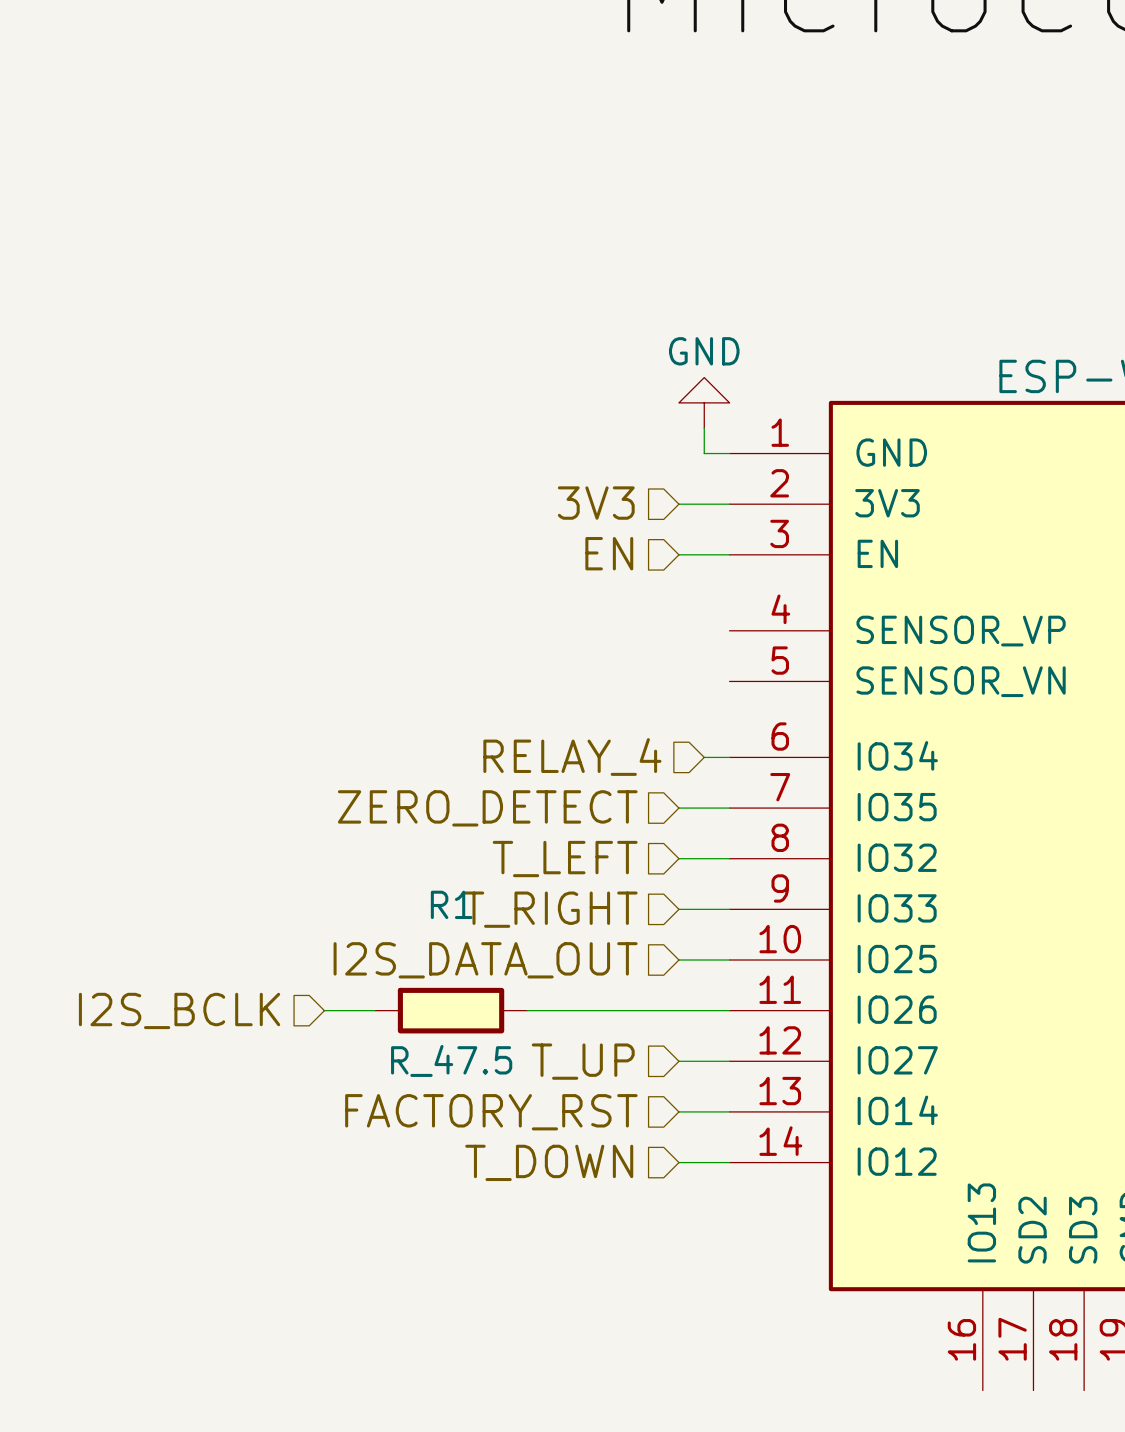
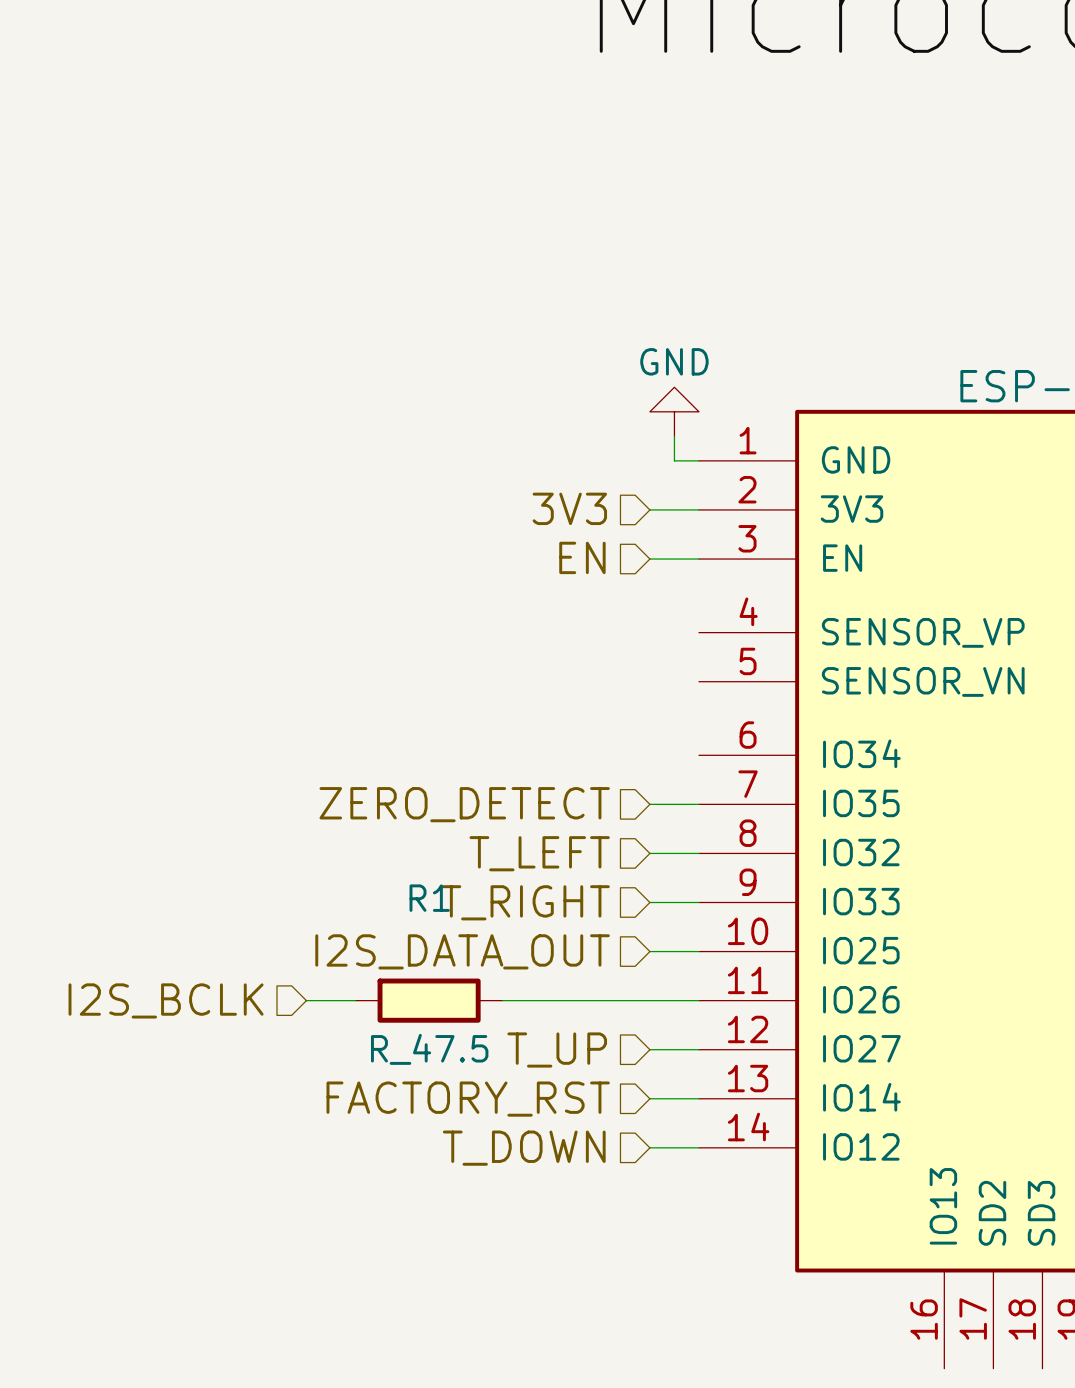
hierarchical label: RELAY_4 (572, 757) -> none
wire: (704, 757) (729, 757) -> none

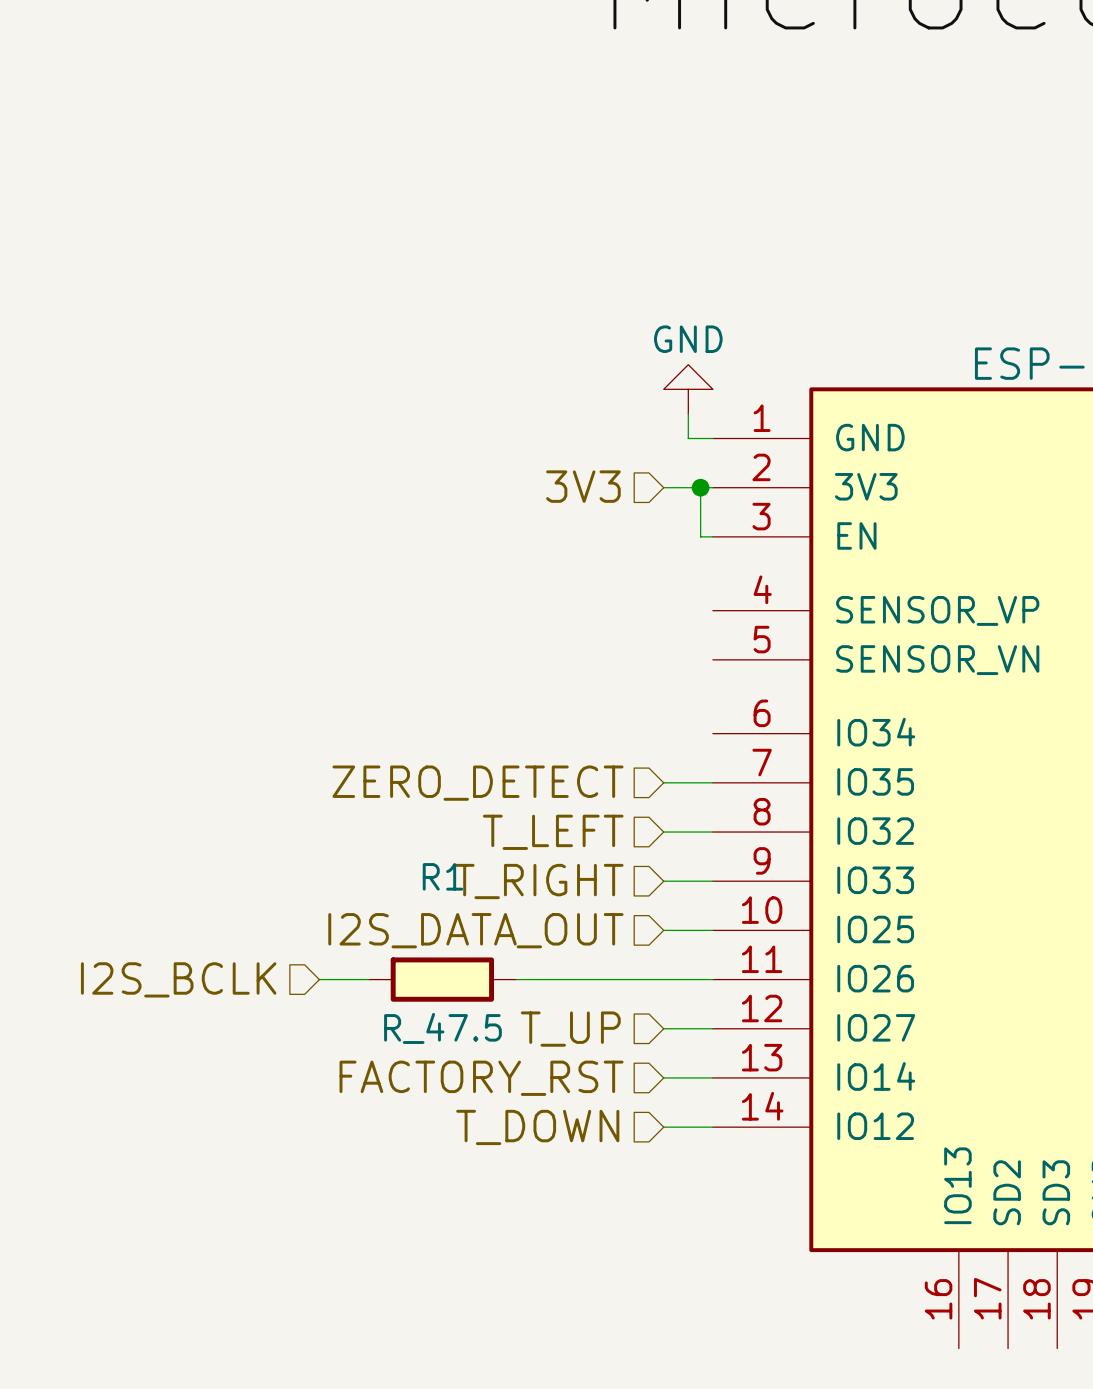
junction: none -> (700, 487)
hierarchical label: EN (582, 557) -> none
wire: (649, 559) (686, 559) -> (700, 487) (700, 536)

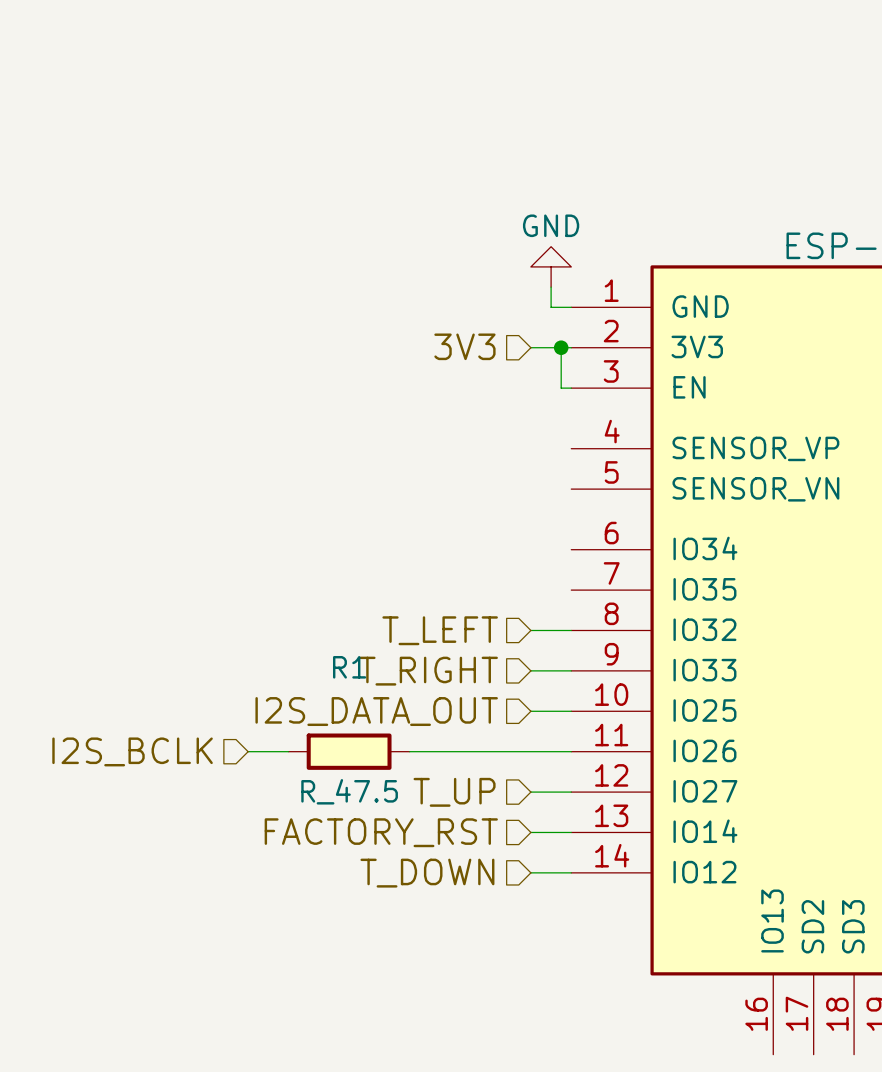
wire: (663, 782) (712, 782) -> none
hierarchical label: ZERO_DETECT (478, 783) -> none

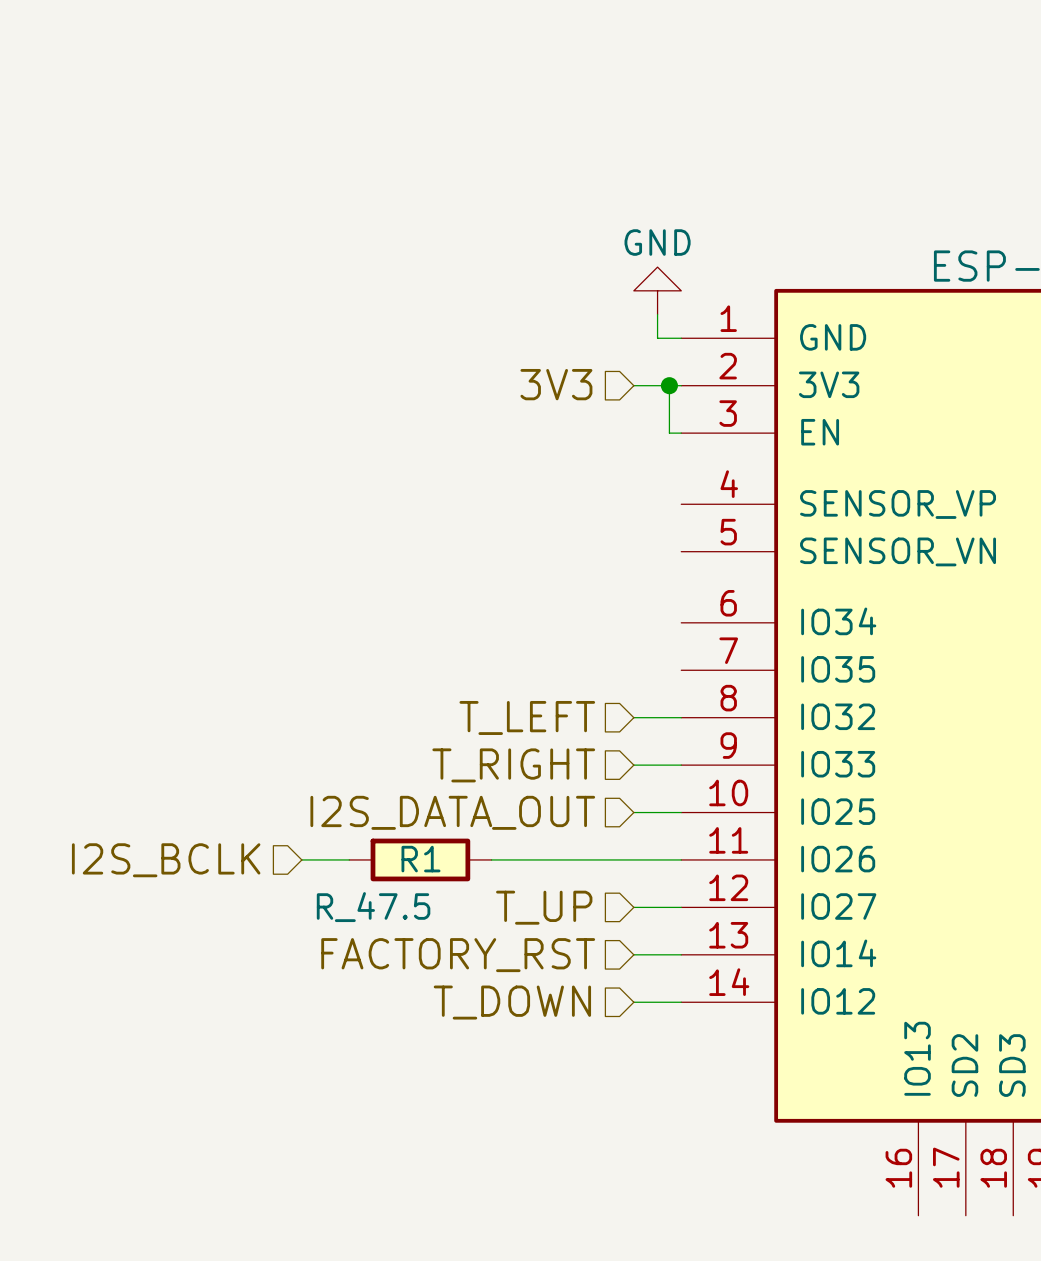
R1 name position: R1 (349, 667) -> R1 (420, 859)
R1 value position: R_47.5 (349, 791) -> R_47.5 (373, 907)

